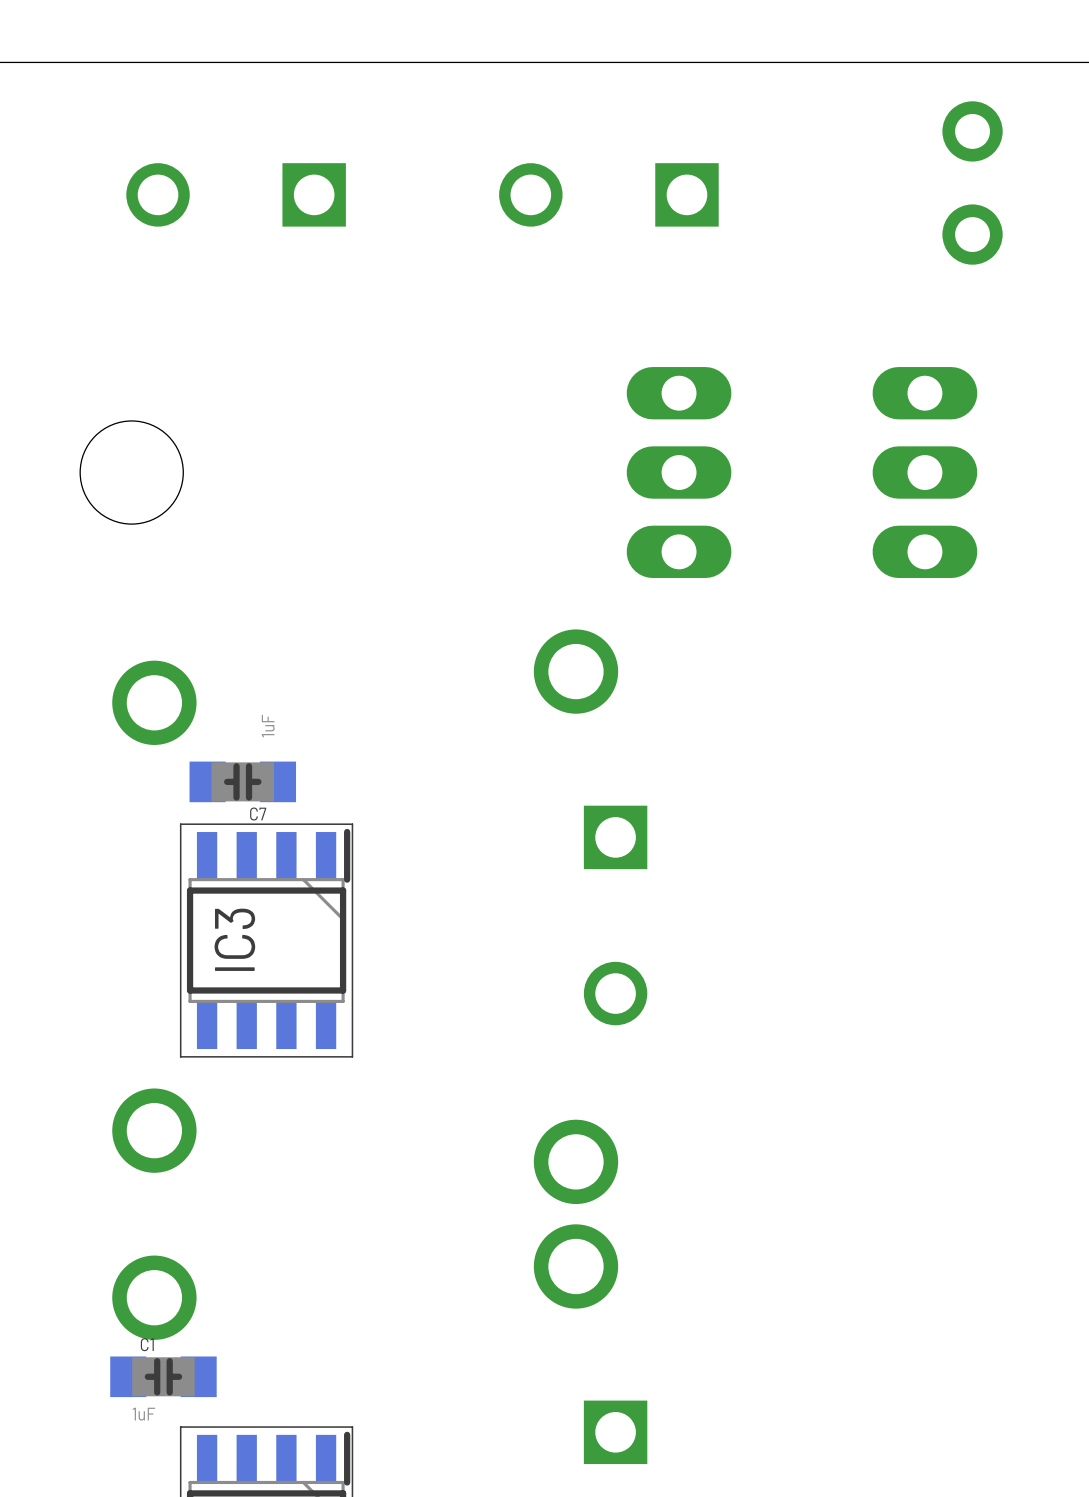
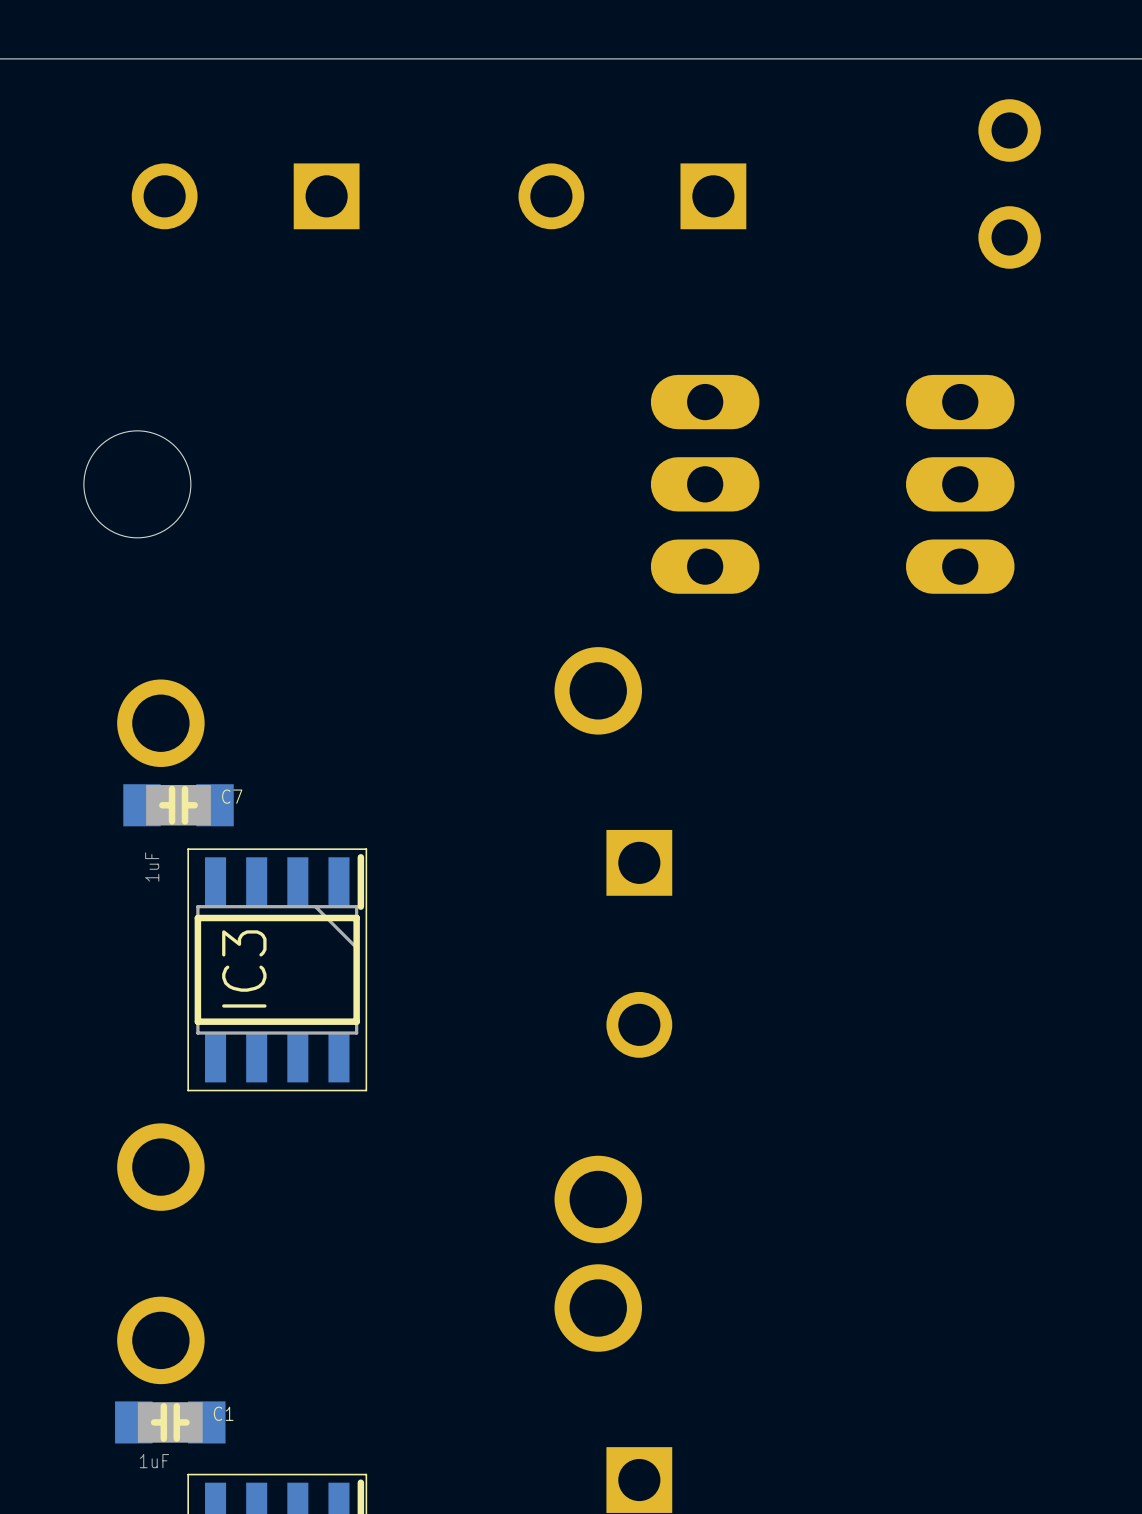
C7 value position: 1uF (268, 726) -> 1uF (152, 867)
C7 position: (242, 781) -> (178, 805)
C7 name position: C7 (258, 814) -> C7 (232, 796)
C1 name position: C1 (147, 1344) -> C1 (223, 1413)

